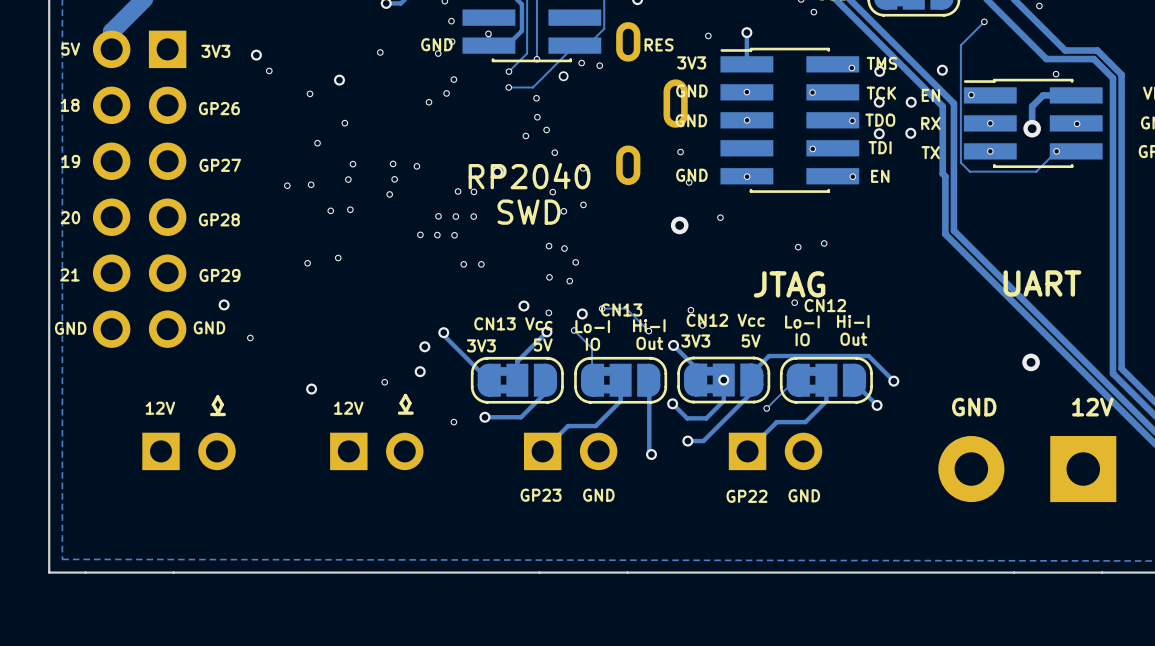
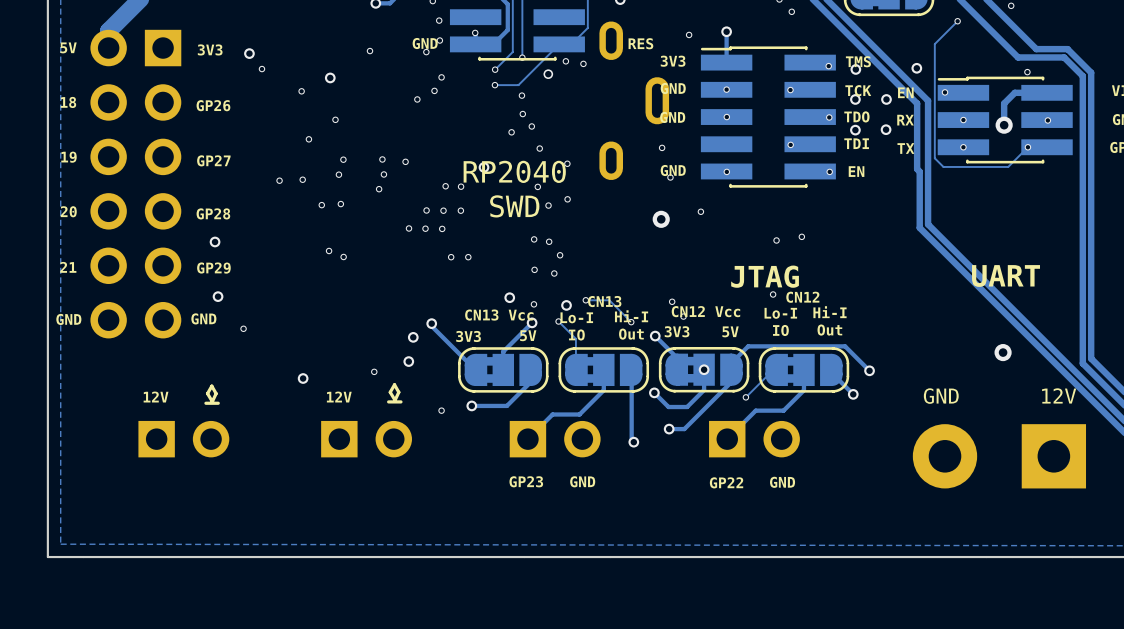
via: none -> (215, 241)
via position: (307, 263) -> (343, 256)

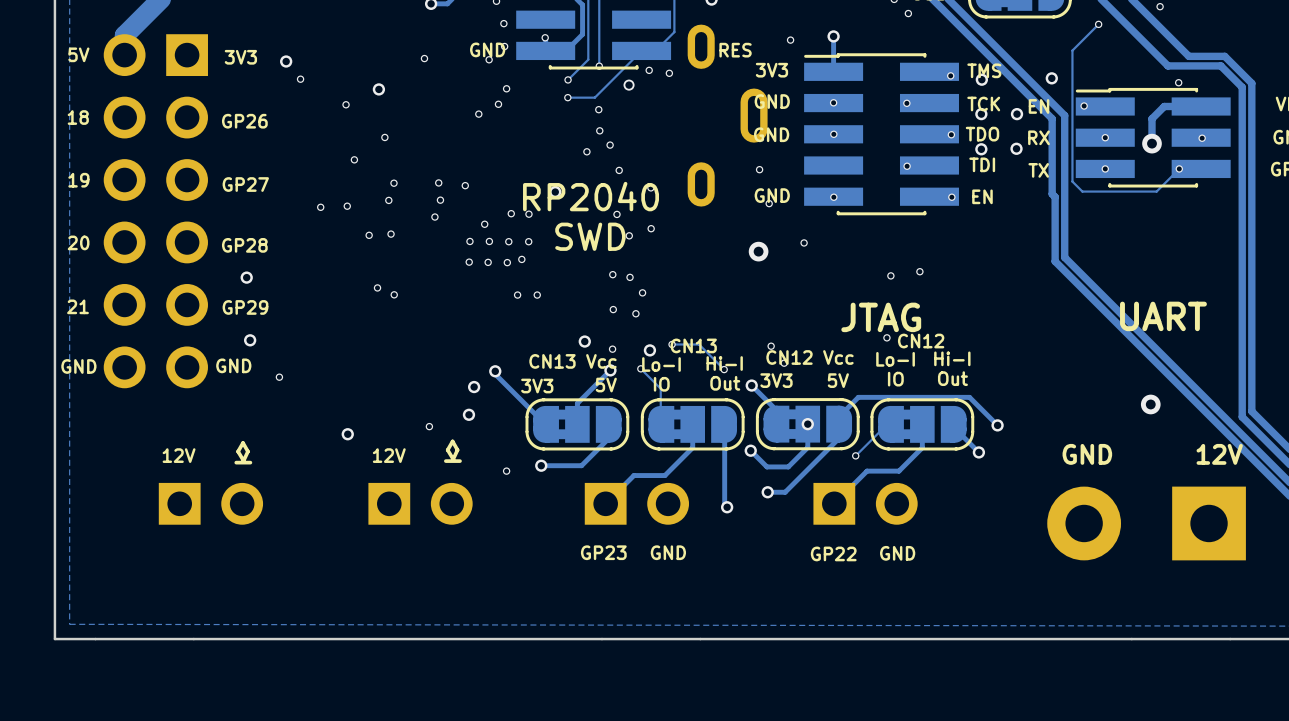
via: none -> (484, 224)
via: none -> (469, 241)
via: none -> (521, 259)

